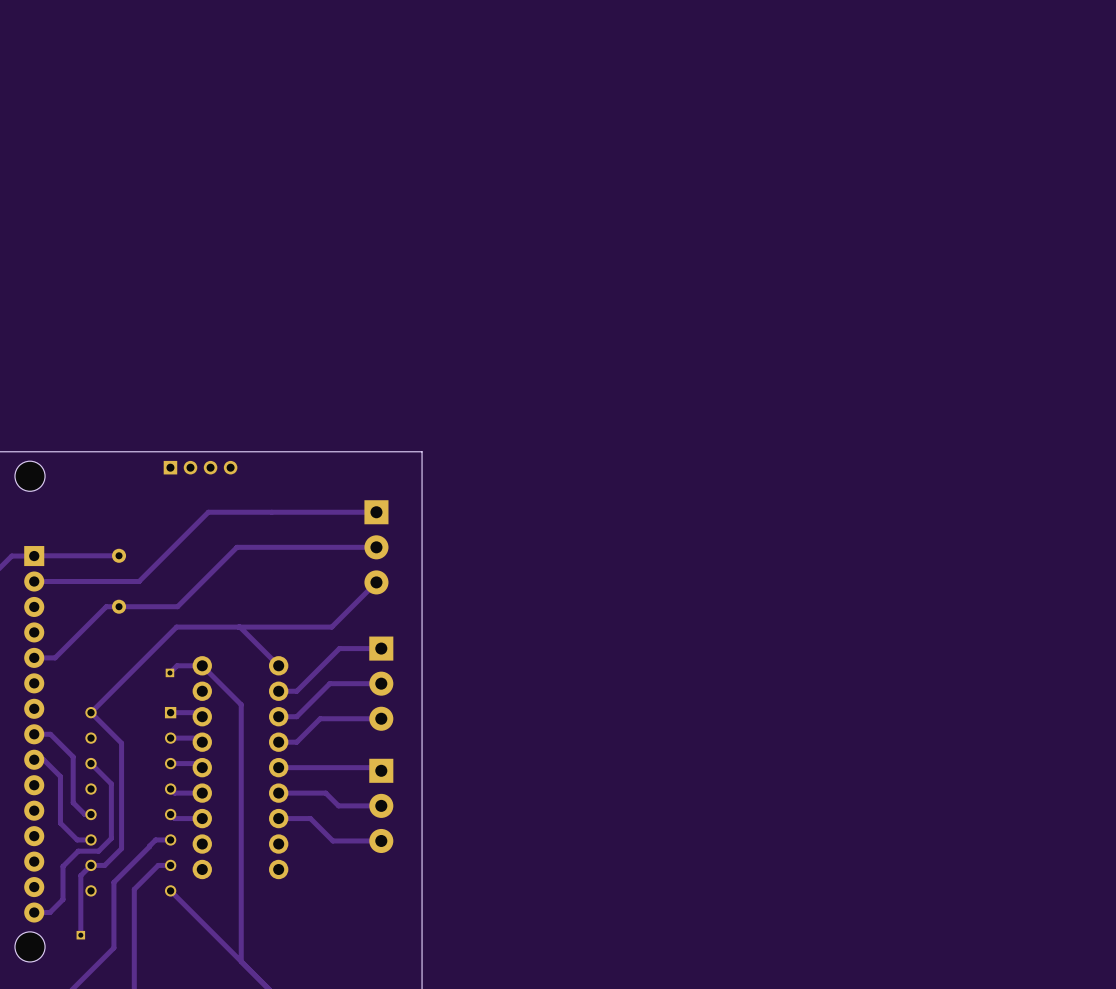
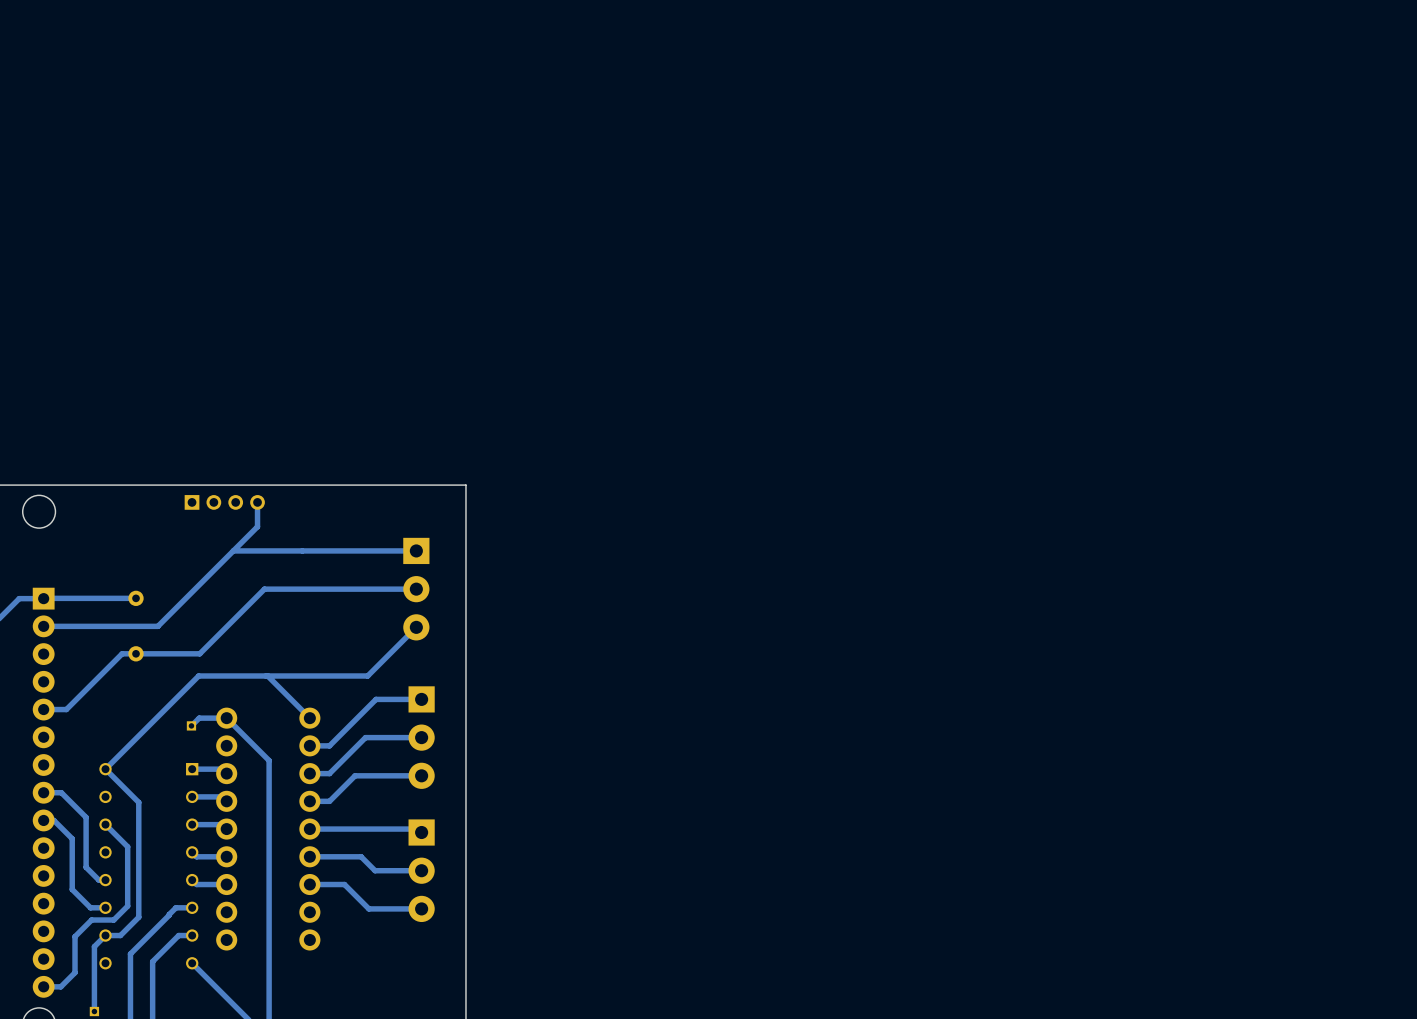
track: none -> (257, 502) (257, 526) (233, 550)

